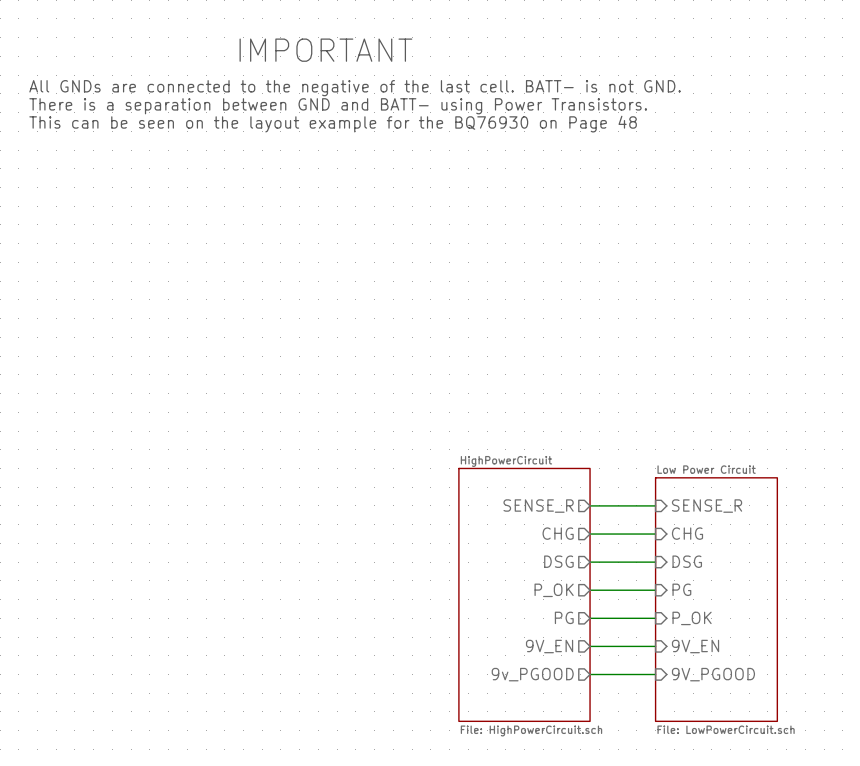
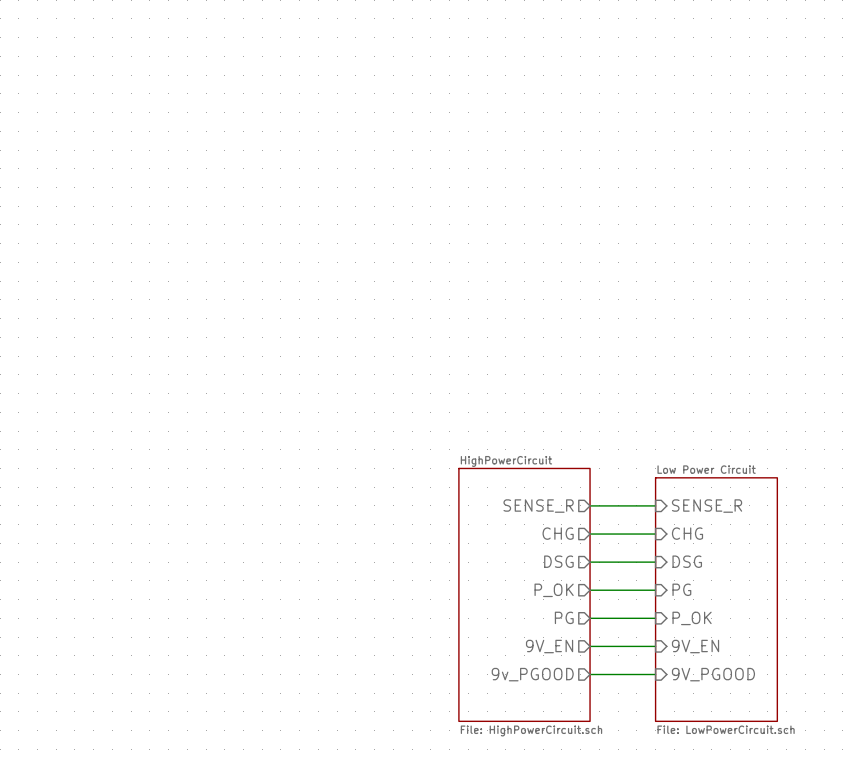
text: IMPORTANT (325, 50) -> none
text: All GNDs are connected to the negative of the last cell. BATT- is not GND. (355, 88) -> none
text: There is a separation between GND and BATT- using Power Transistors. (338, 106) -> none
text: This can be seen on the layout example for the BQ76930 on Page 48 (333, 124) -> none

